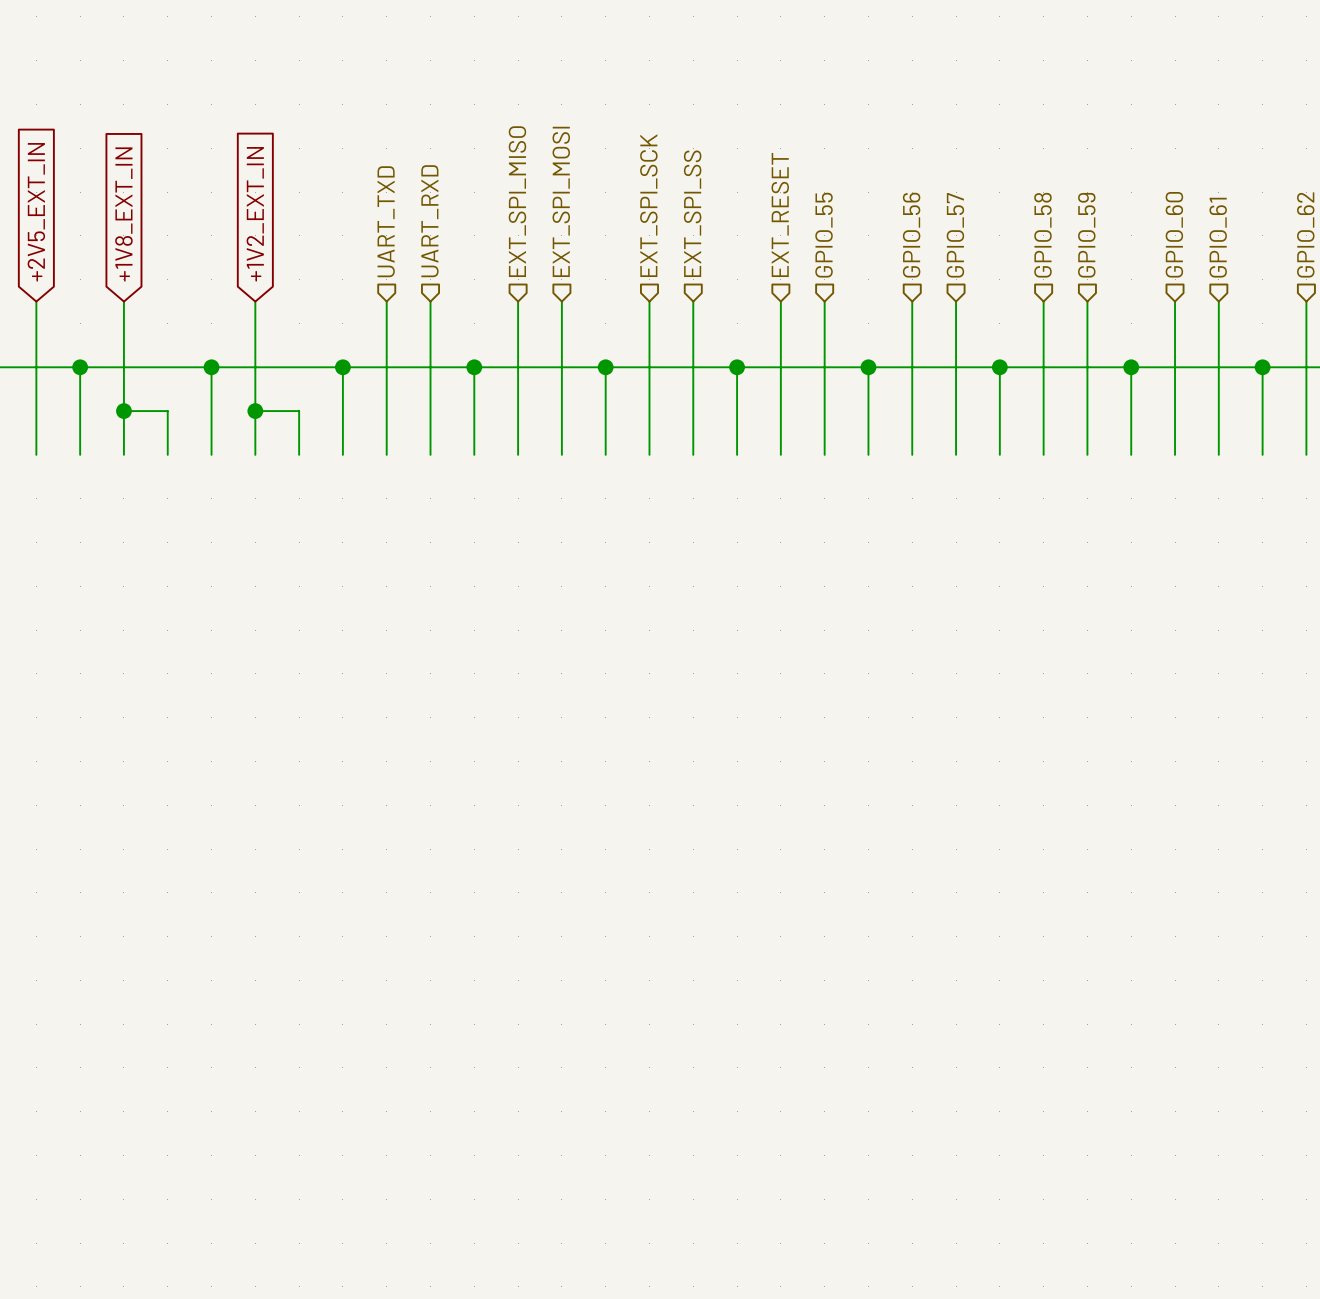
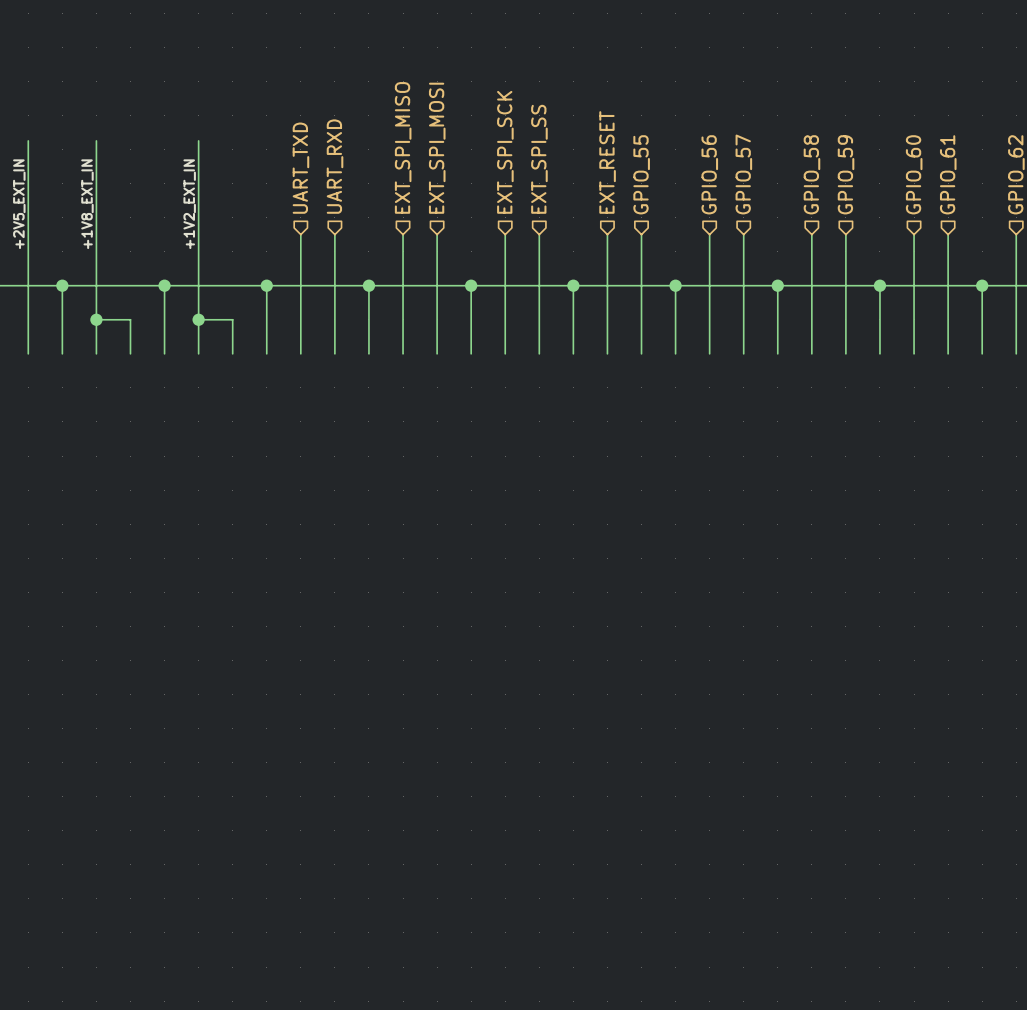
wire: none -> (28, 140) (28, 234)
wire: none -> (96, 140) (96, 234)
wire: none -> (198, 140) (198, 234)
global label: +2V5_EXT_IN (36, 212) -> none
global label: +1V8_EXT_IN (123, 214) -> none
global label: +1V2_EXT_IN (255, 214) -> none
label: none -> +2V5_EXT_IN (19, 204)
label: none -> +1V8_EXT_IN (87, 204)
label: none -> +1V2_EXT_IN (189, 204)

